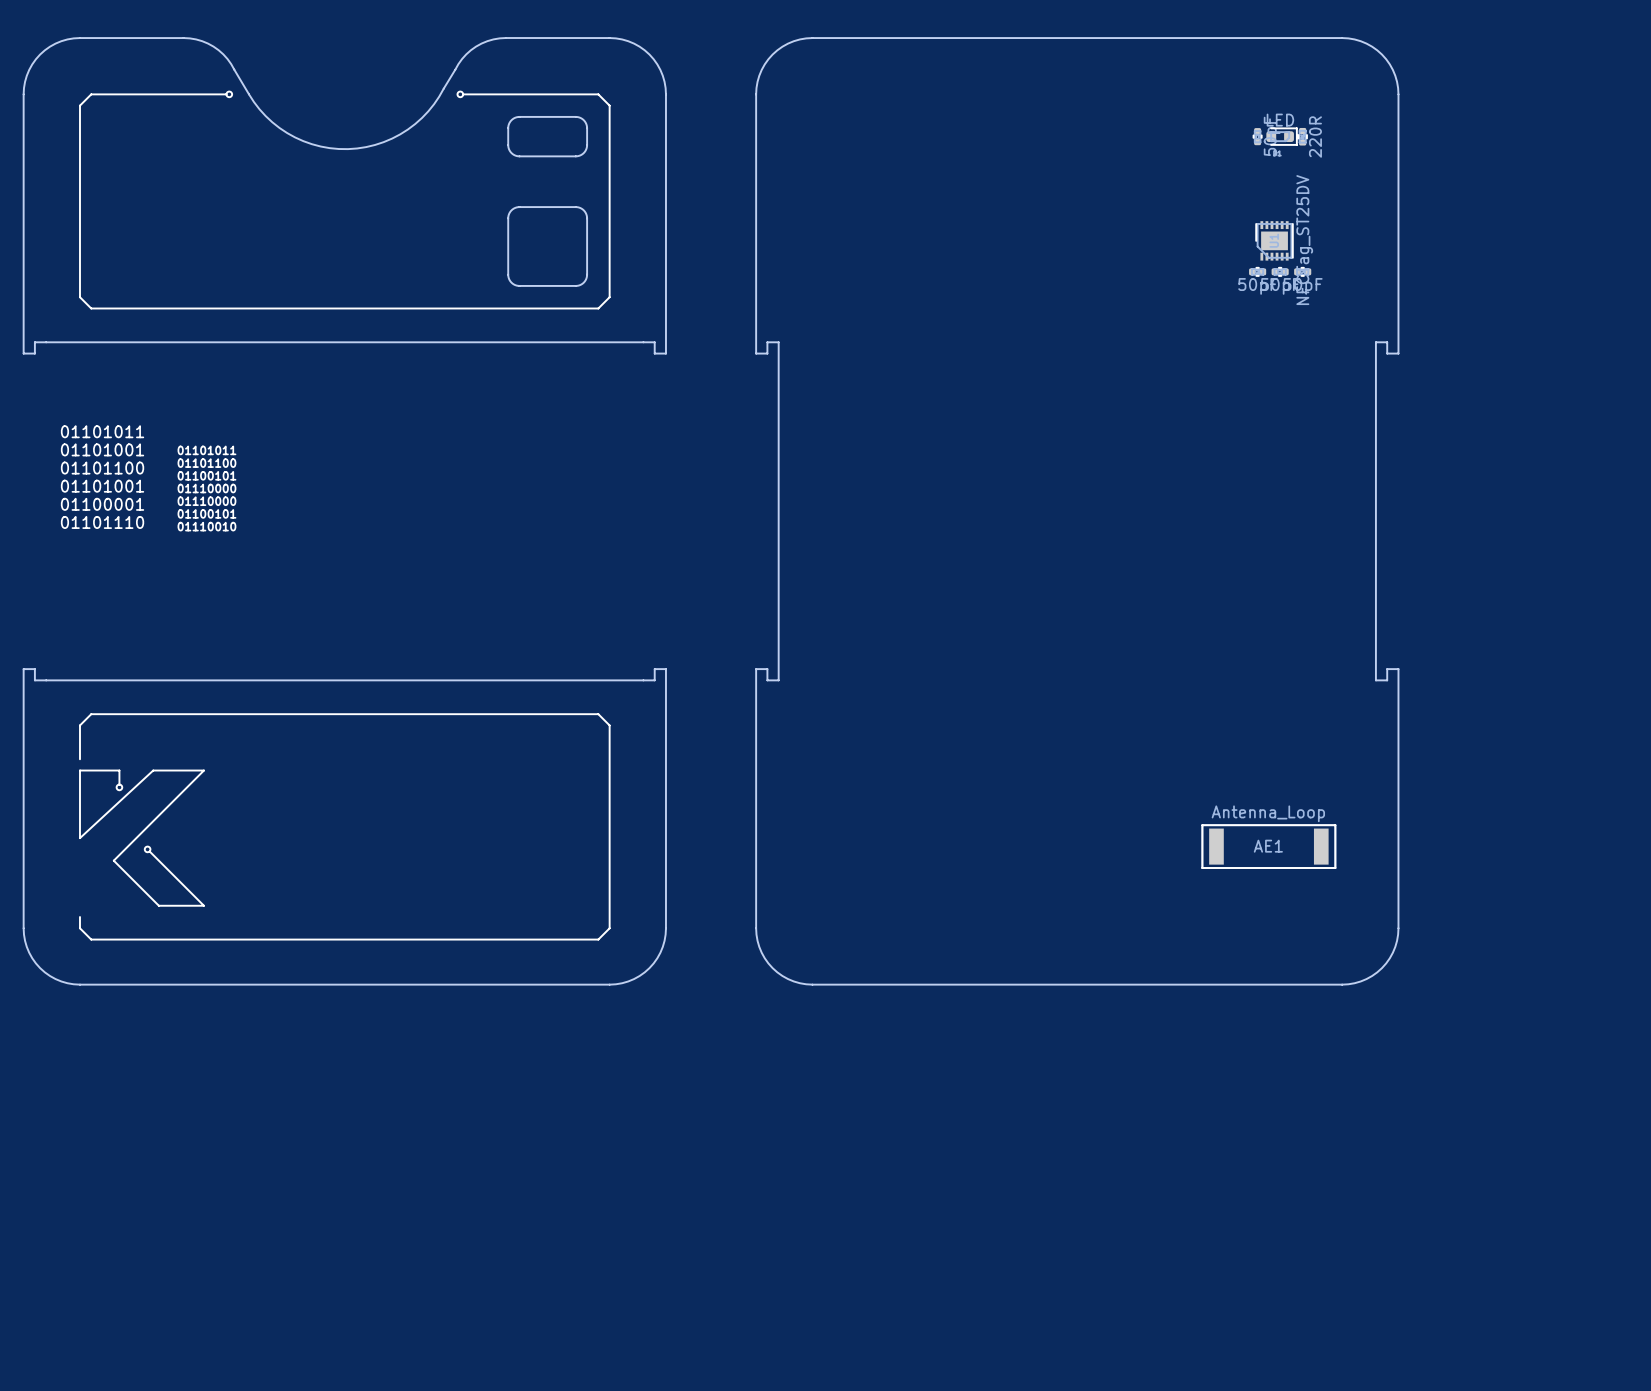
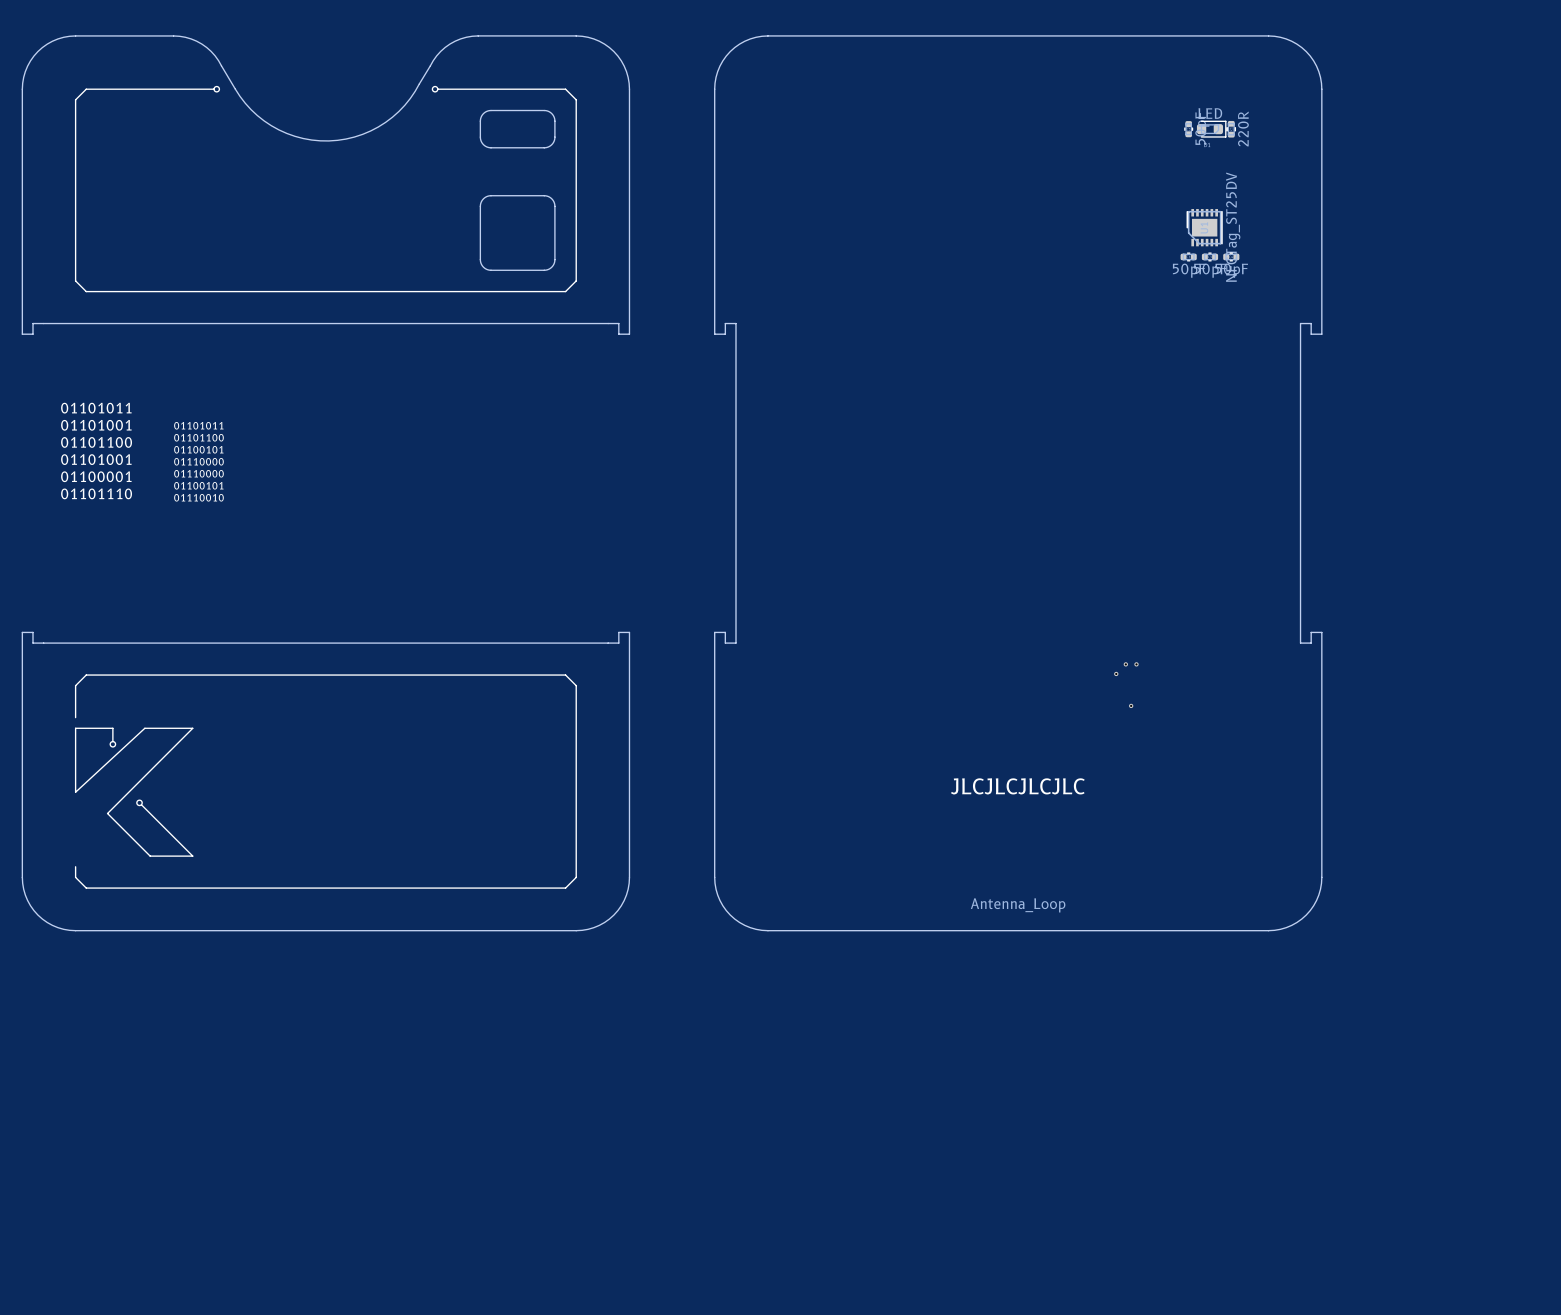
part: none -> Antenna_Loop (1126, 685)
text: none -> JLCJLCJLCJLC (1017, 786)
AE1: Antenna_Loop (1268, 846) -> none

